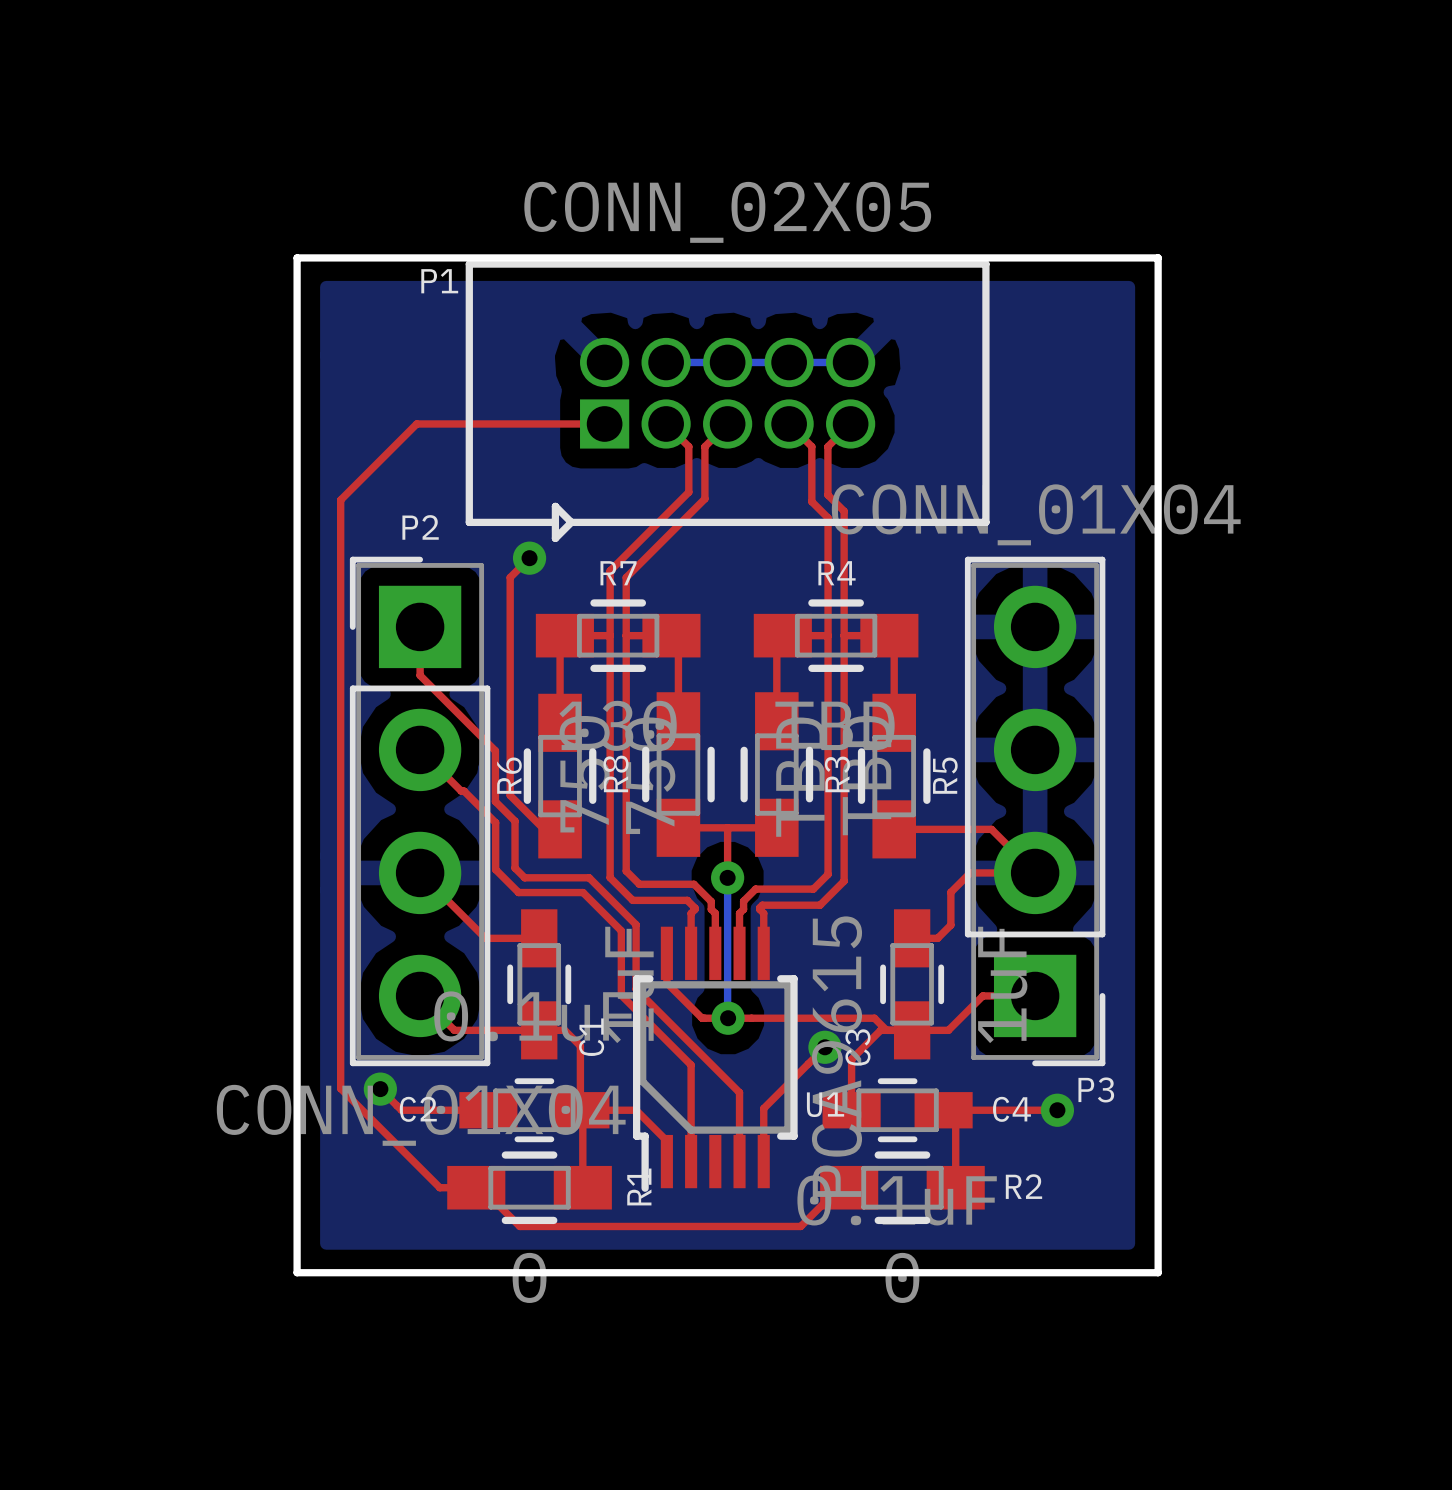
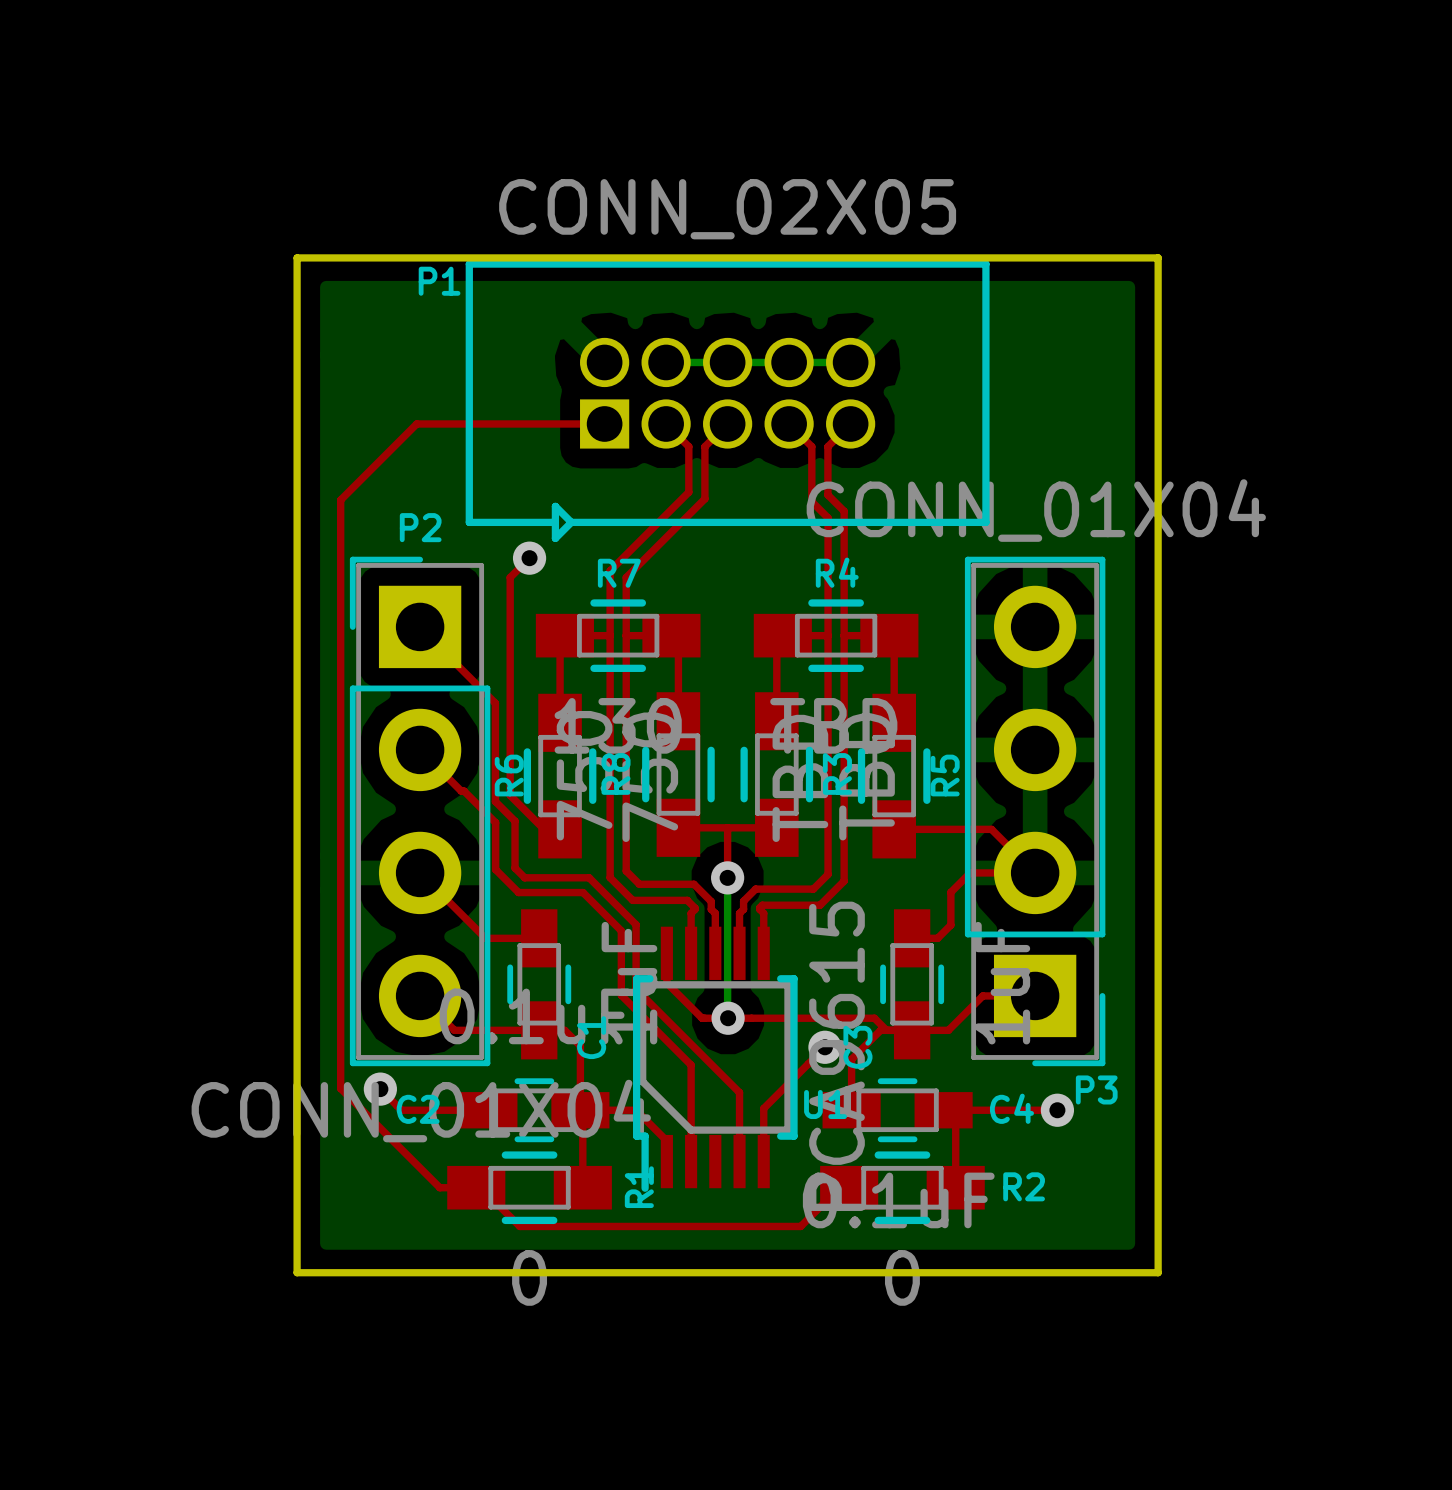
top track: (420, 627) (420, 675) (495, 750) -> (420, 627) (495, 703) (495, 750)

